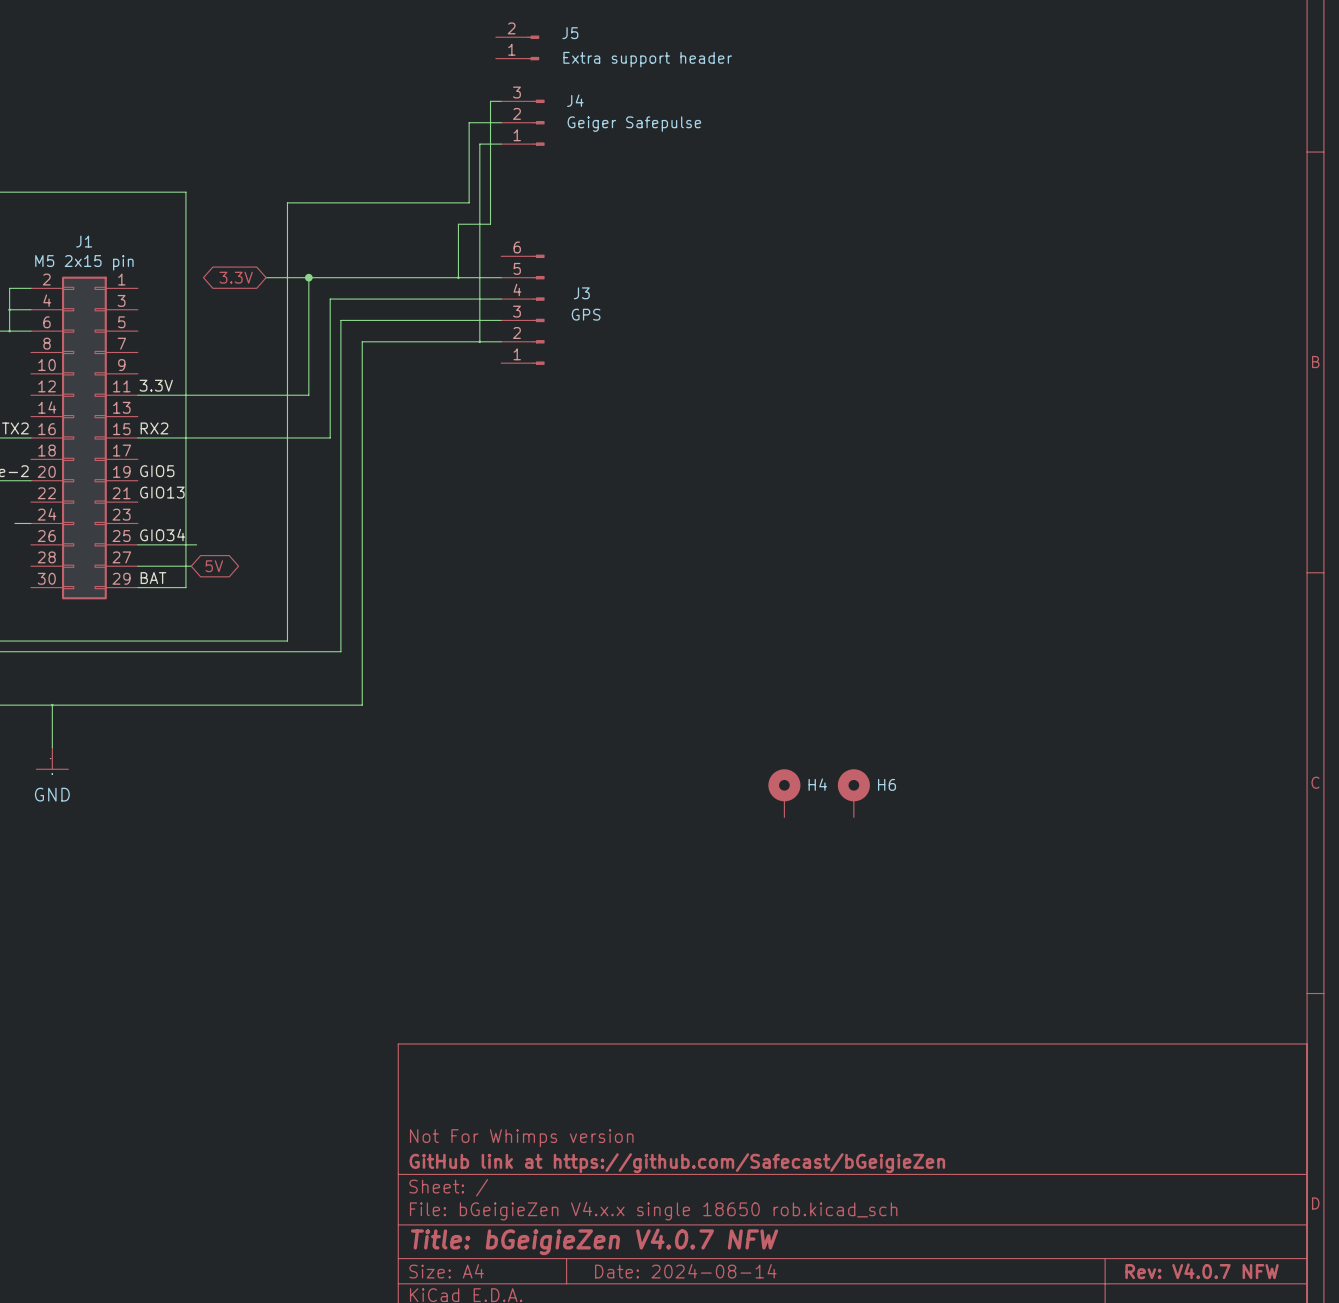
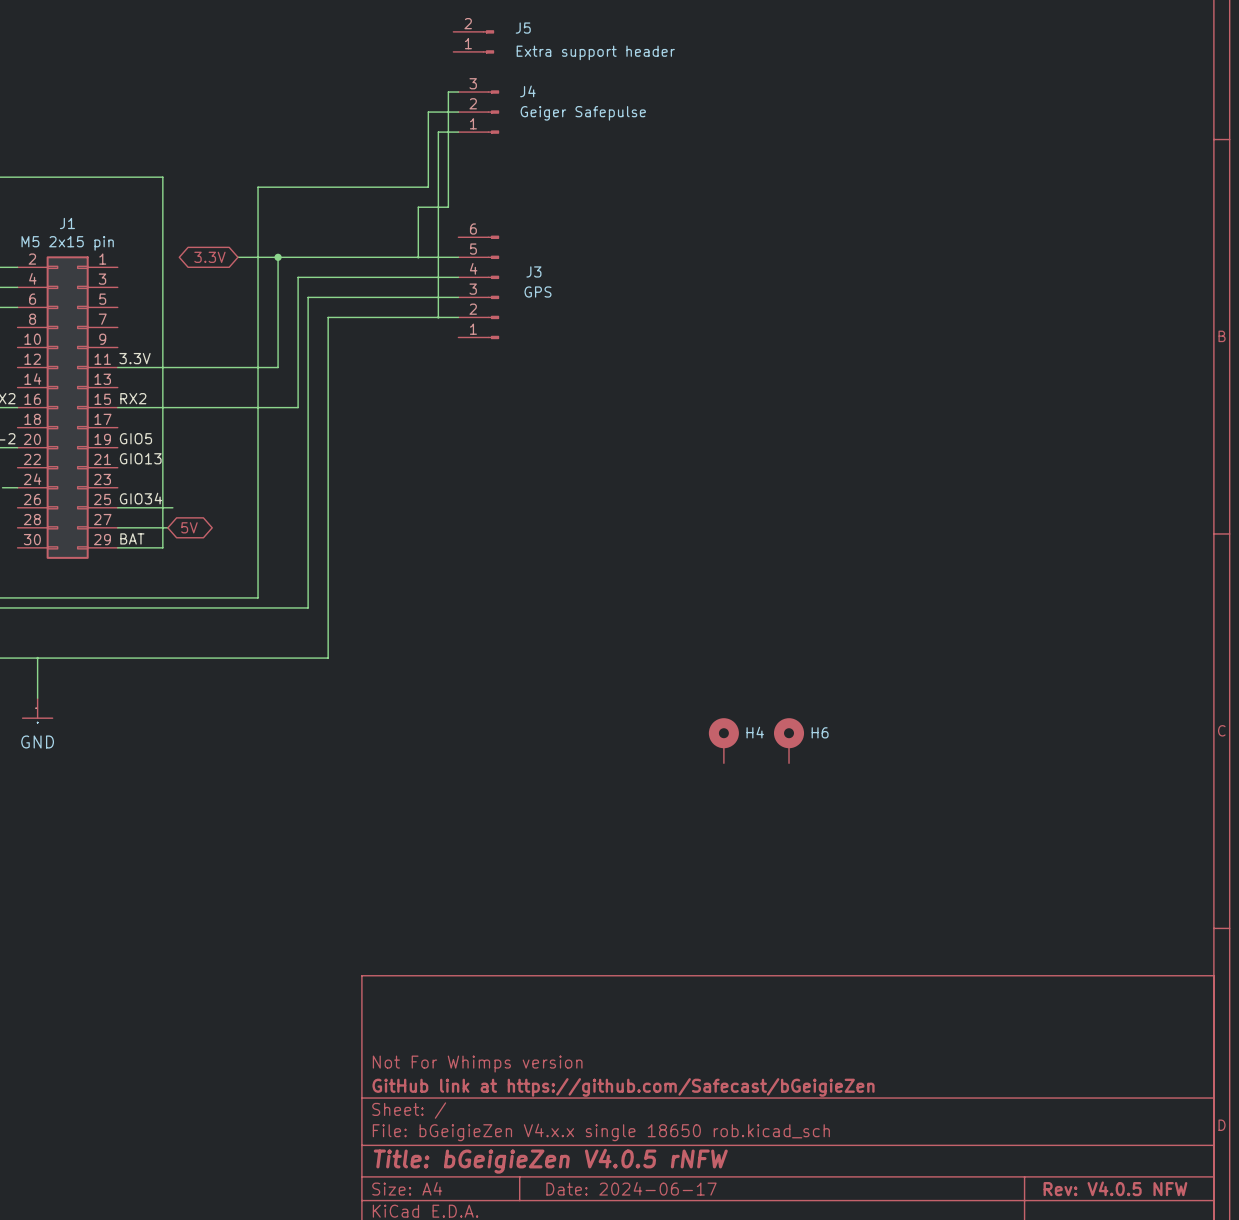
title block: Title: bGeigieZen V4.0.7 NFW (594, 1241) -> Title: bGeigieZen V4.0.5 rNFW (550, 1161)
title block: Date: 2024-08-14 (685, 1271) -> Date: 2024-06-17 (631, 1188)
title block: Rev: V4.0.7 NFW (1202, 1271) -> Rev: V4.0.5 NFW (1115, 1188)

